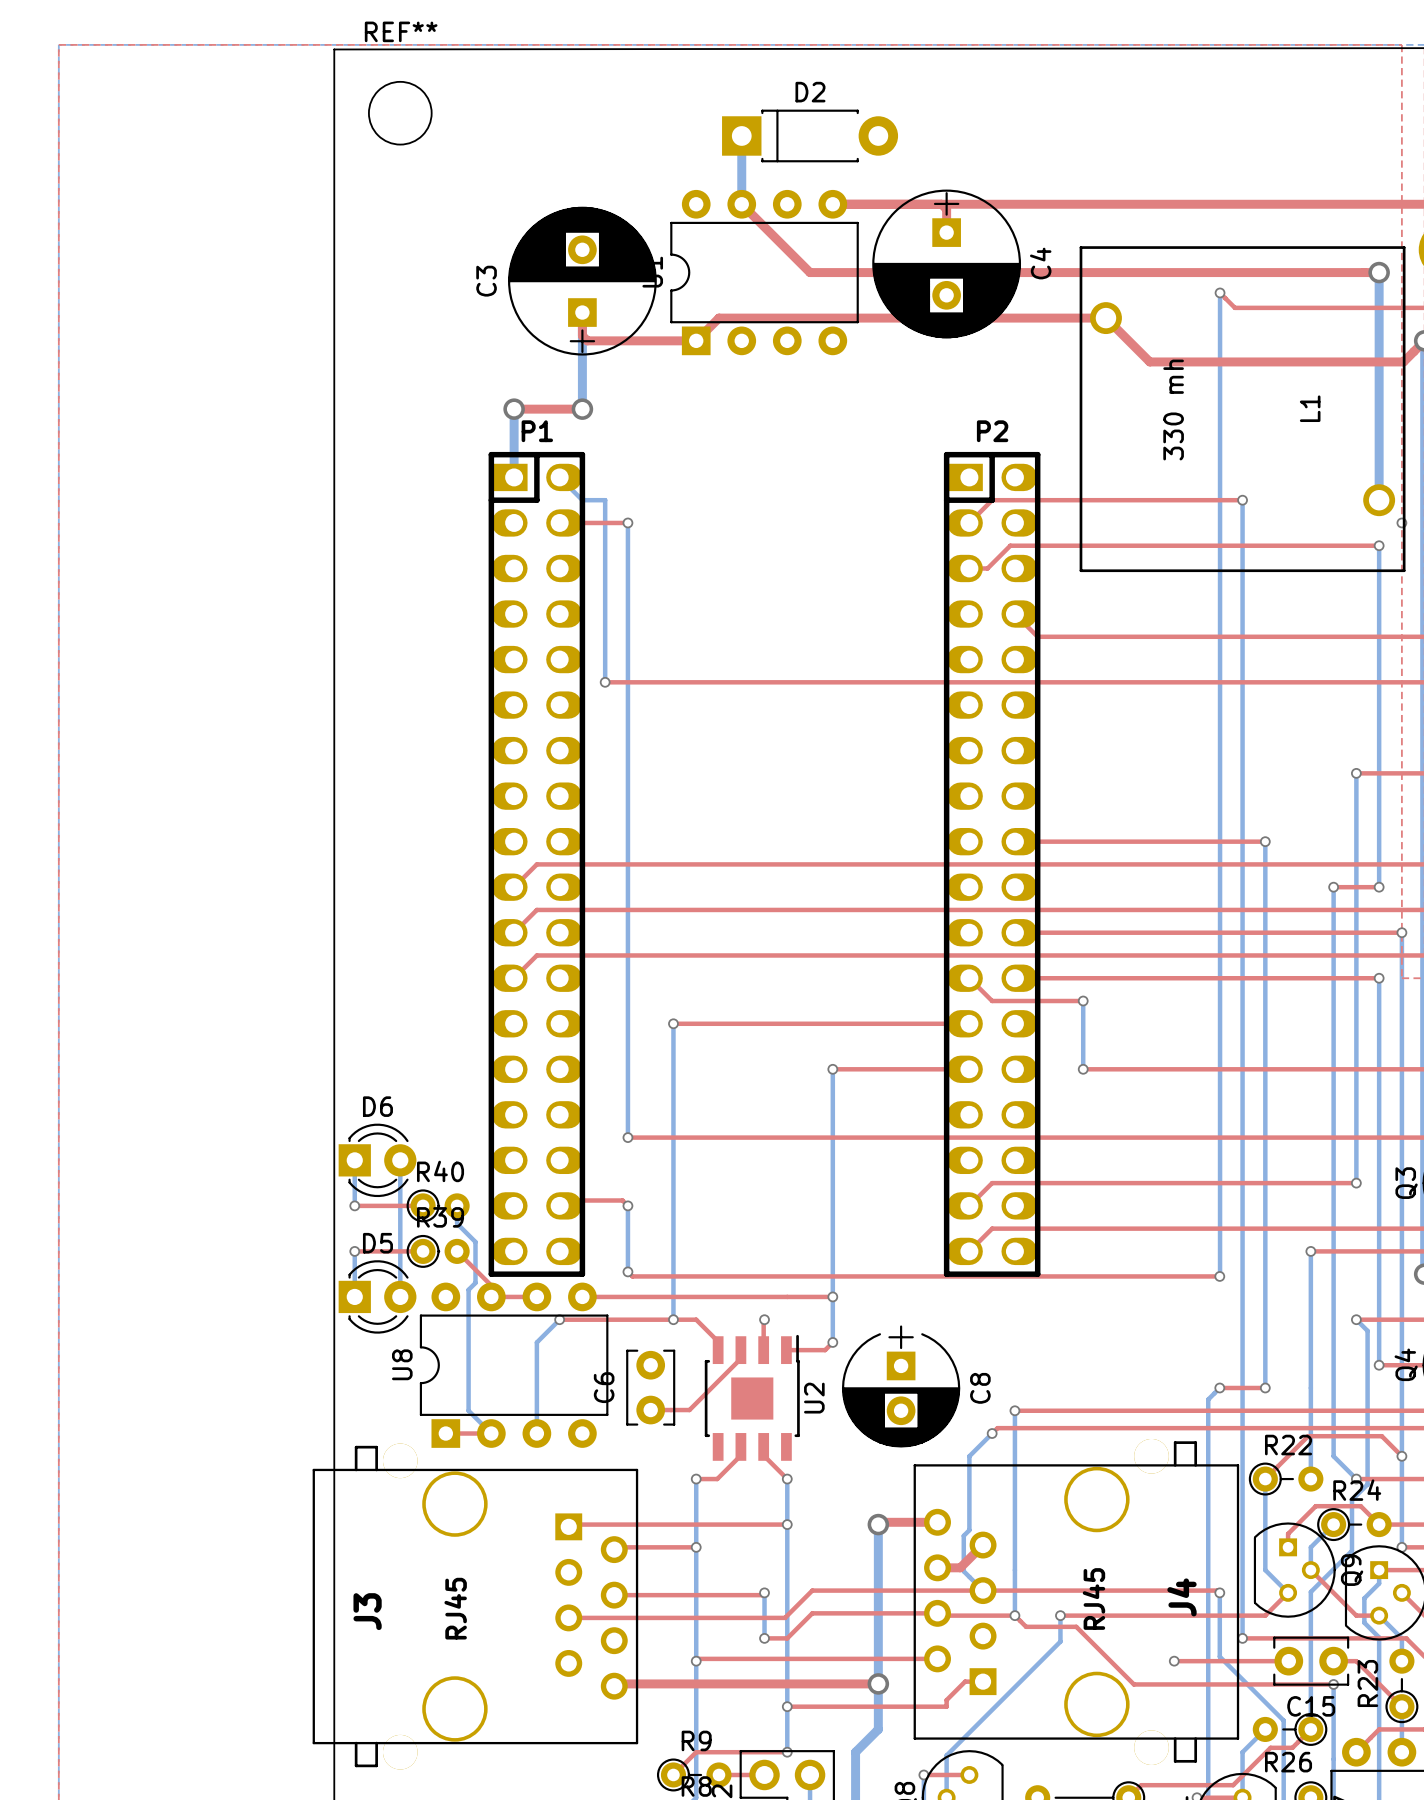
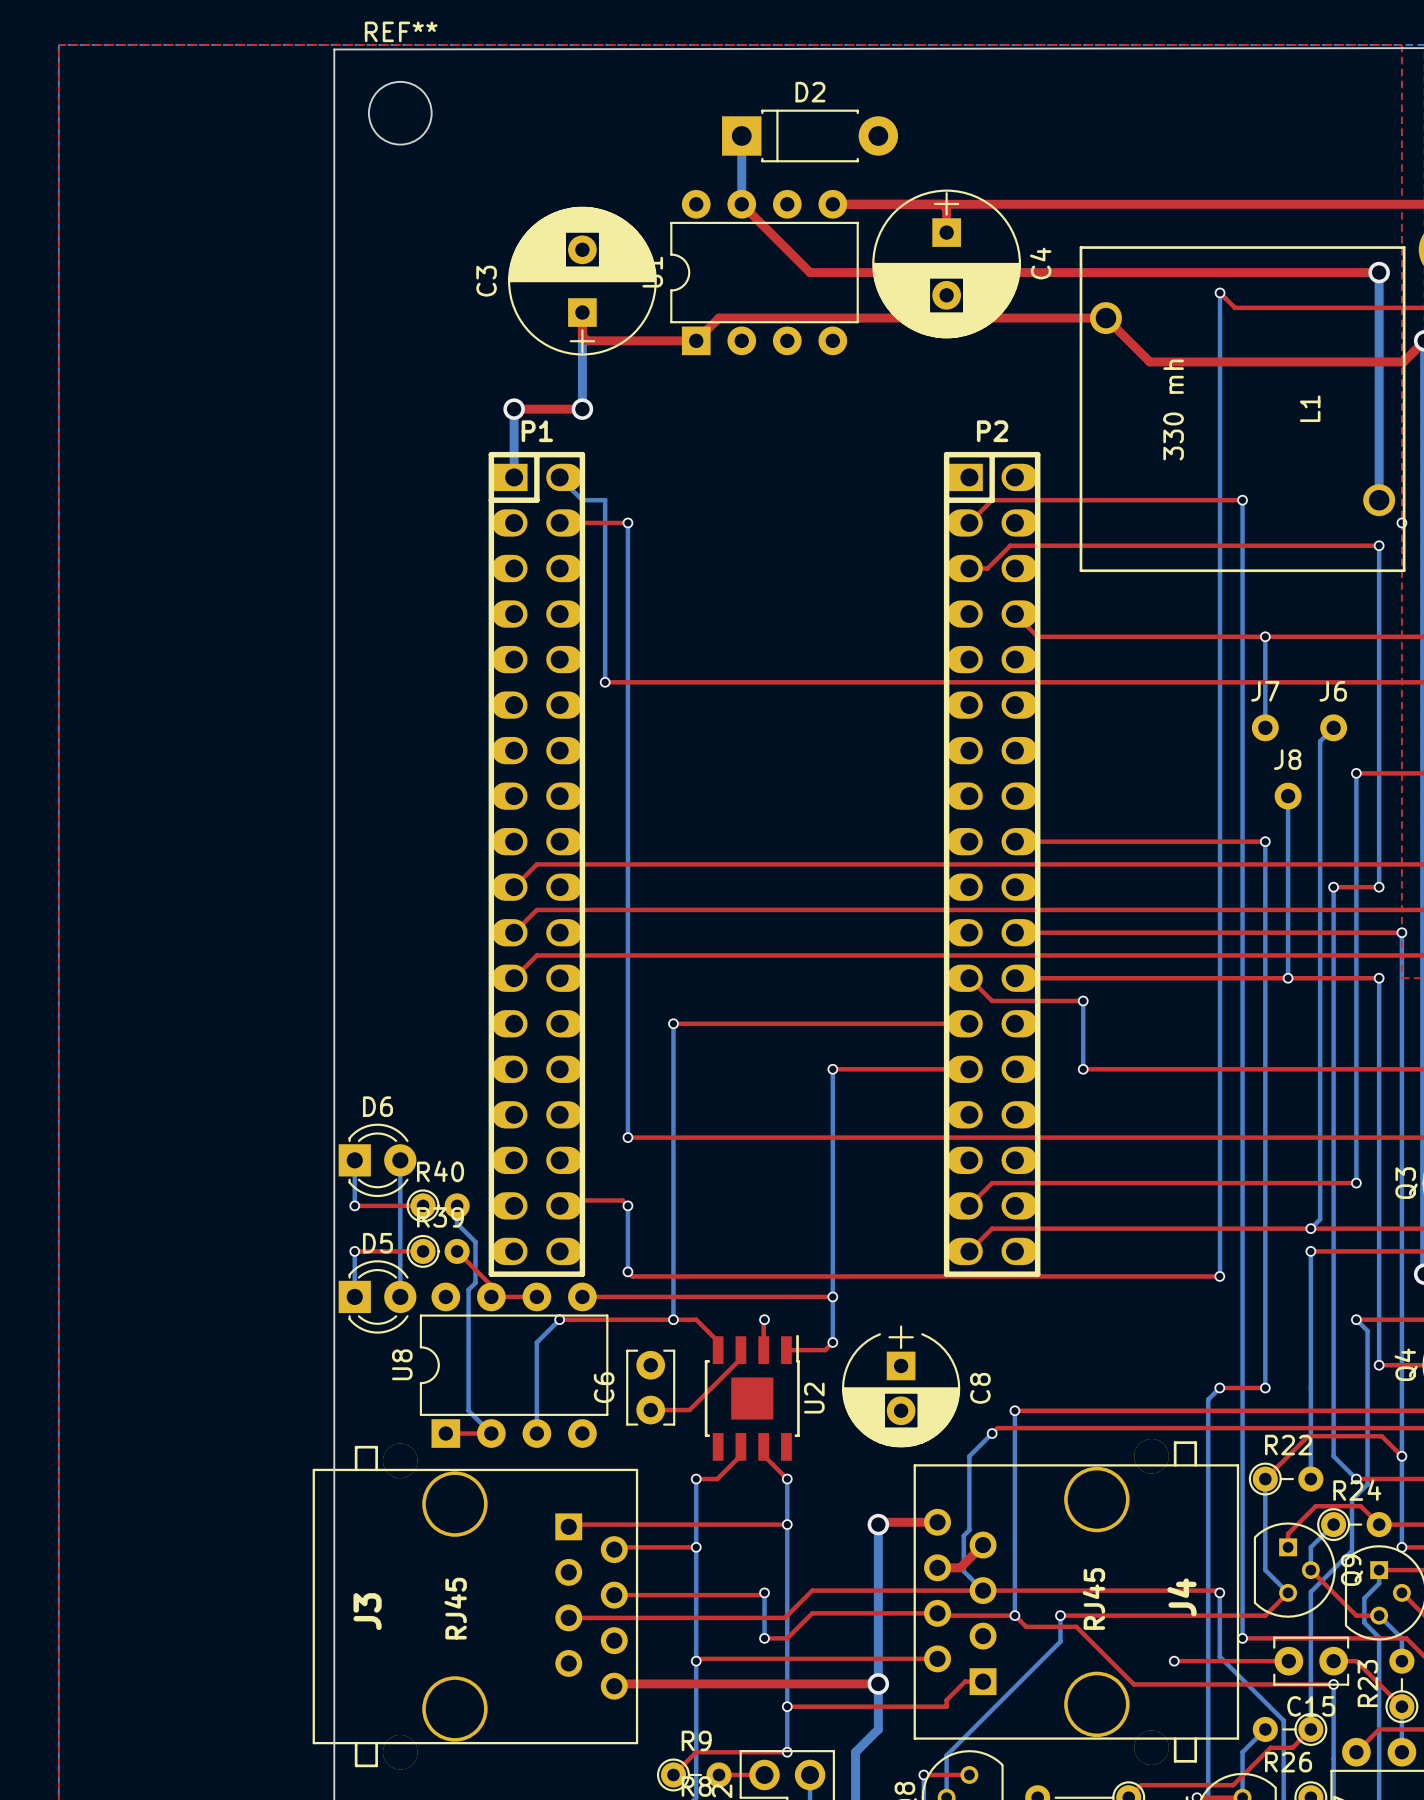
bottom track: none -> (1265, 636) (1265, 727)
via: none -> (1265, 636)
J7: none -> (1265, 727)
bottom track: none -> (1333, 727) (1320, 741) (1320, 1219) (1310, 1228)
J6: none -> (1333, 727)
bottom track: none -> (1288, 796) (1288, 978)
J8: none -> (1288, 796)
via: none -> (1288, 978)
via: none -> (1310, 1228)

